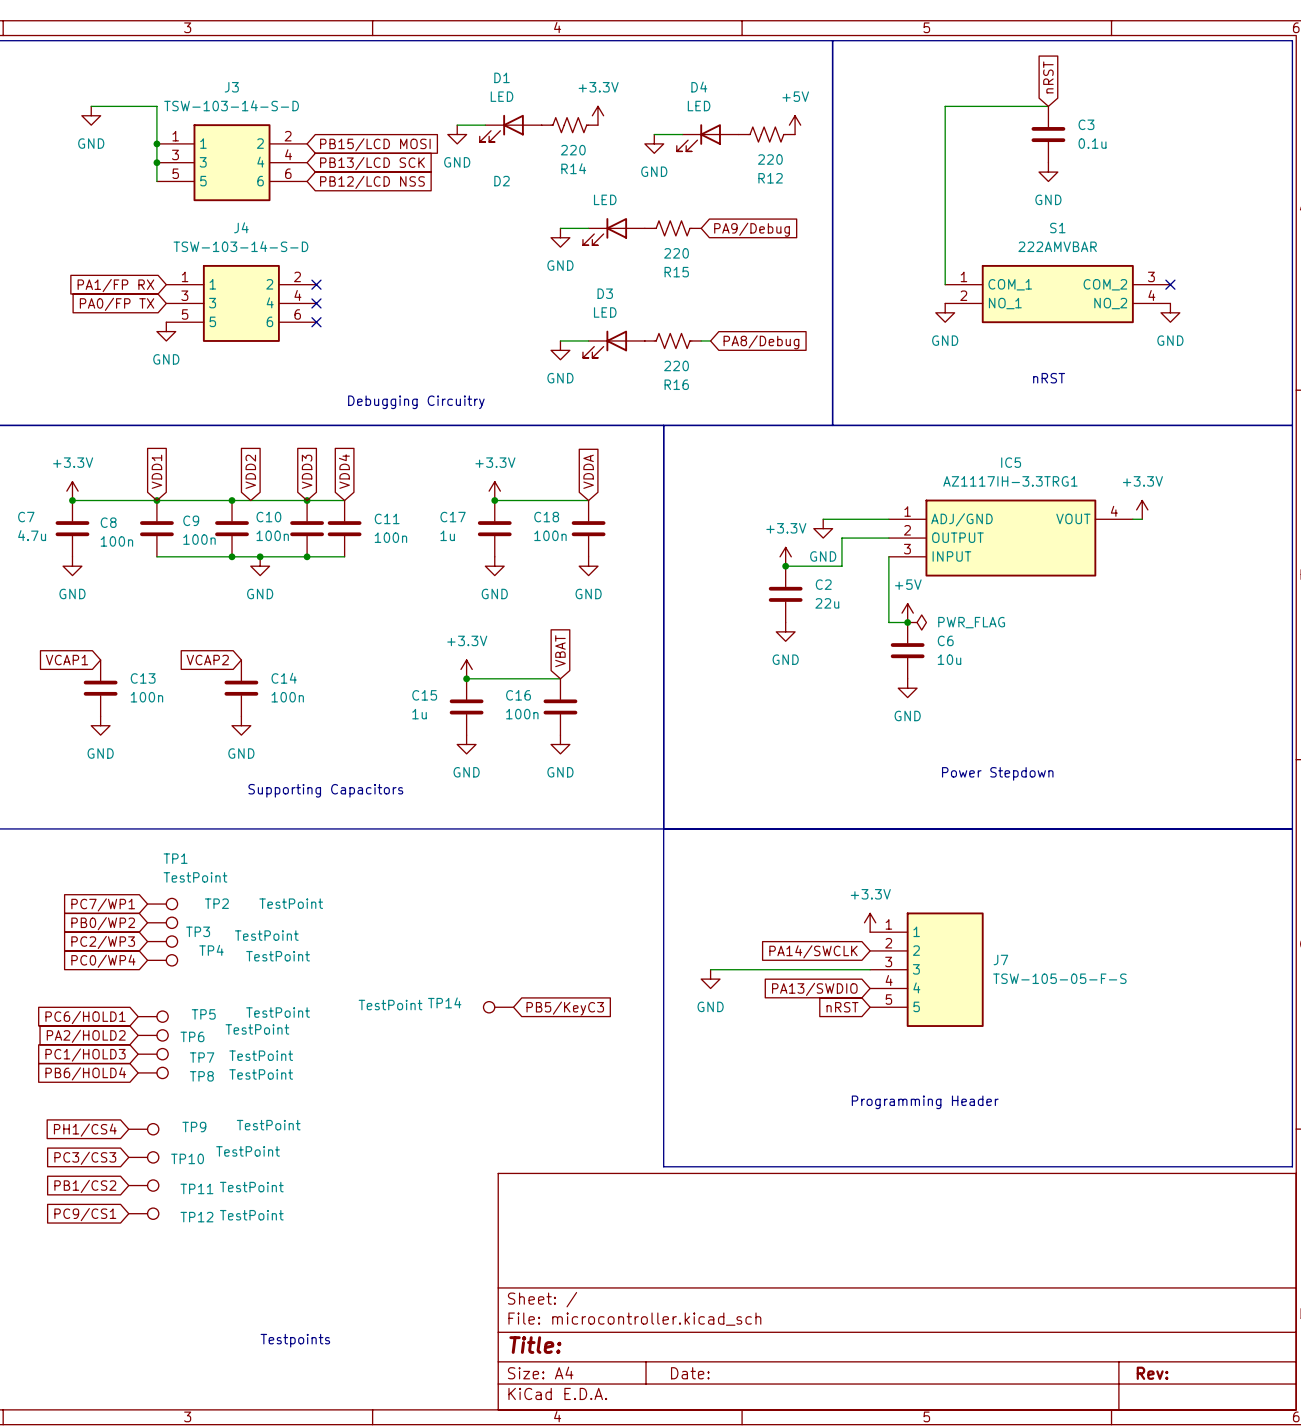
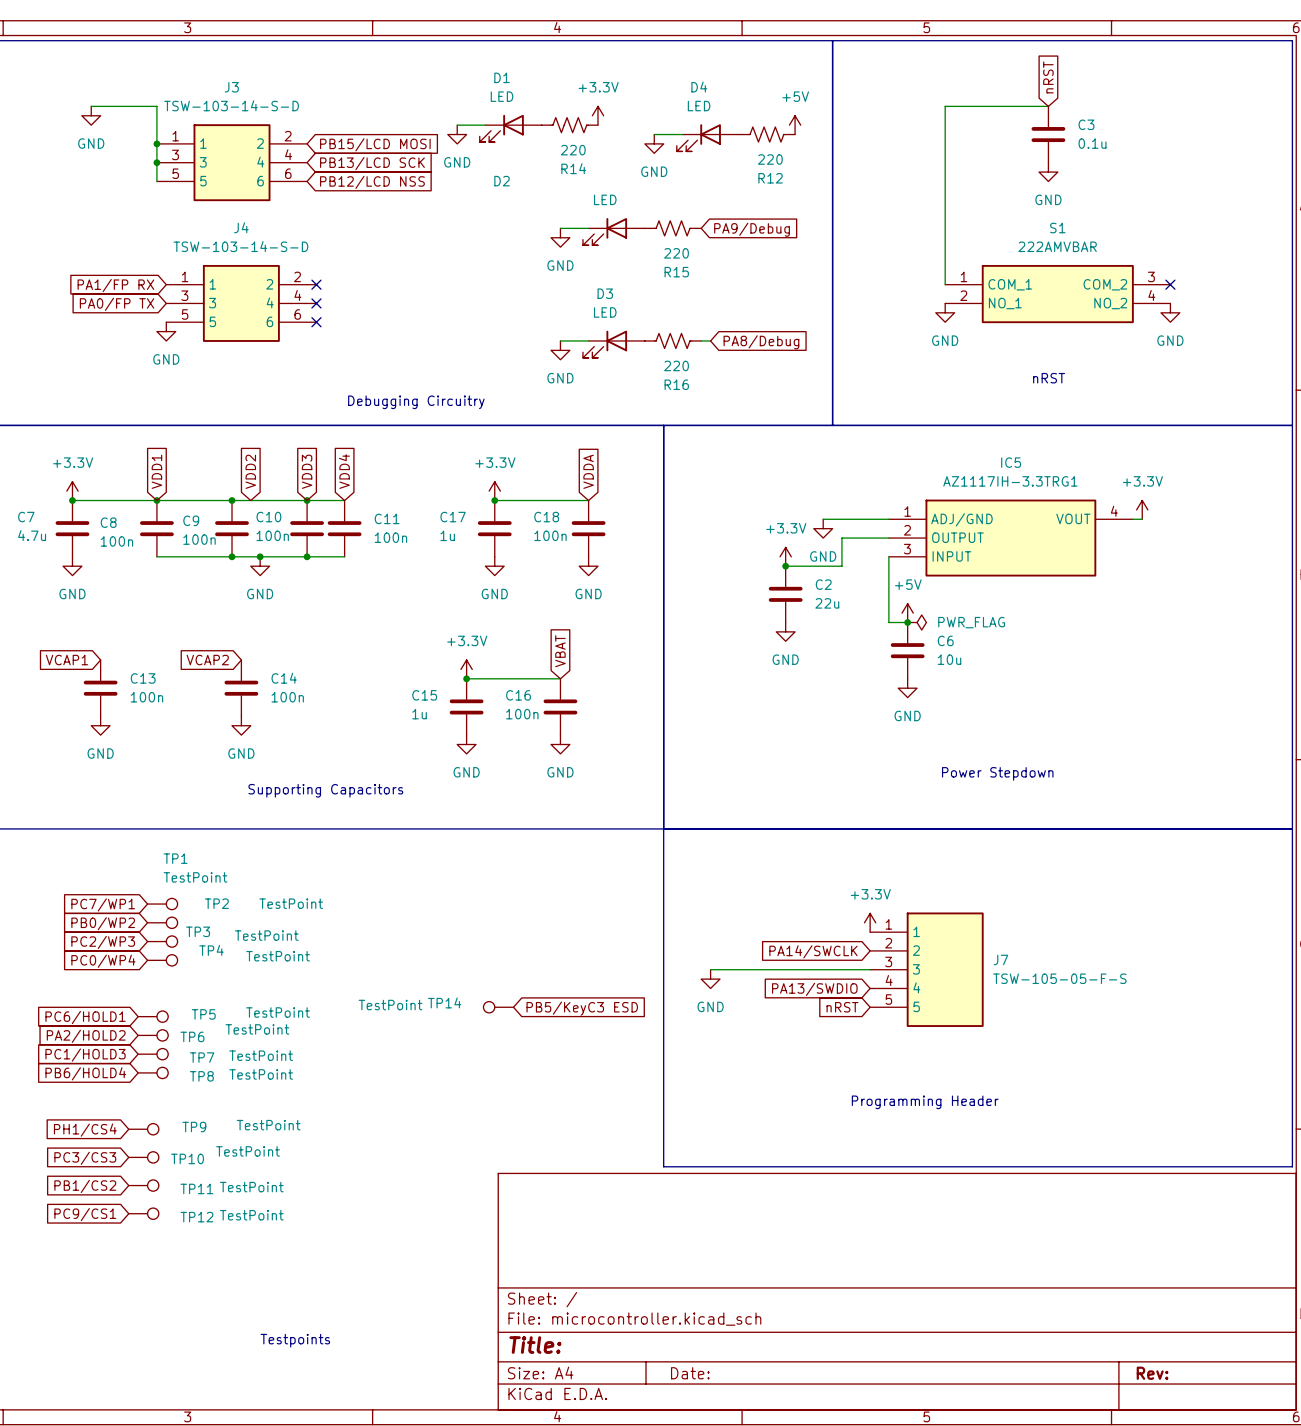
global label: PB5/KeyC3 (565, 1008) -> PB5/KeyC3 ESD (582, 1008)

